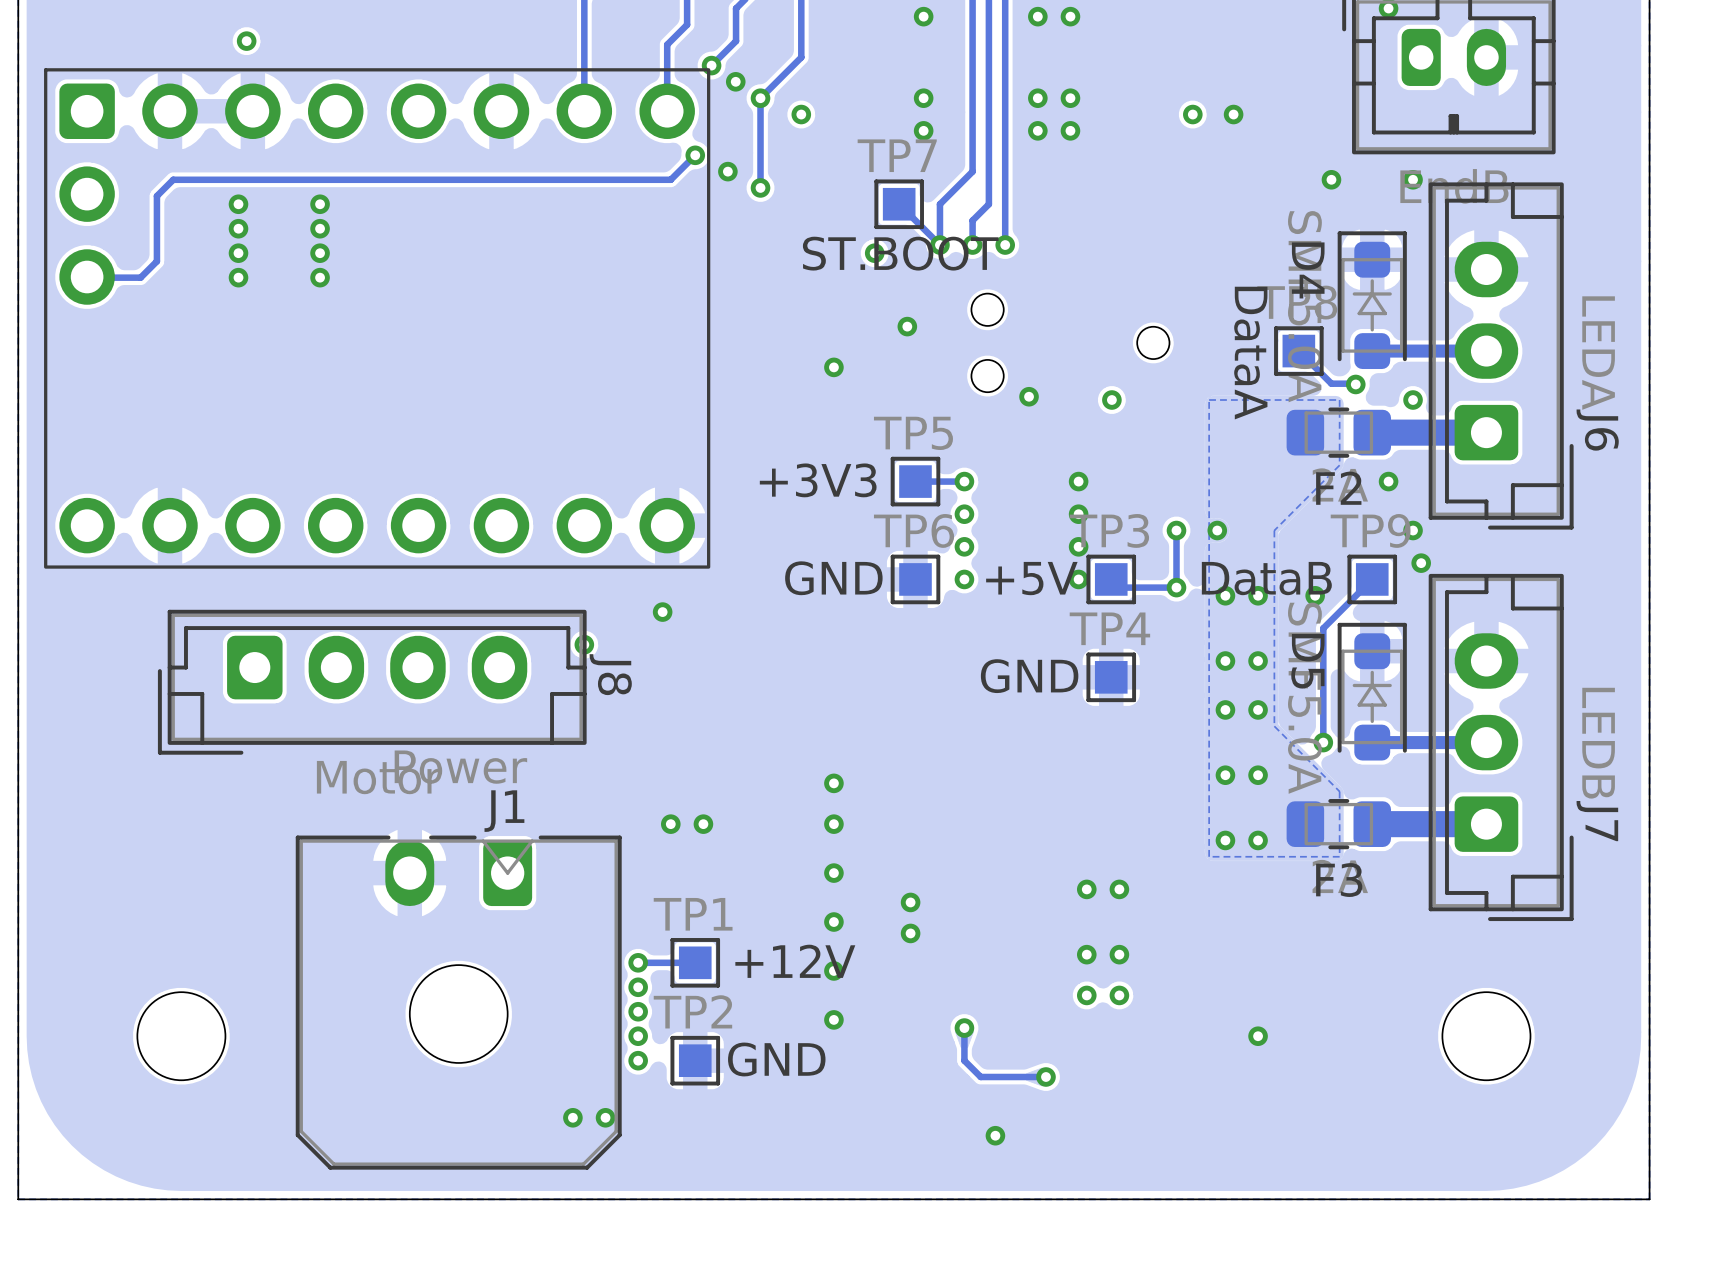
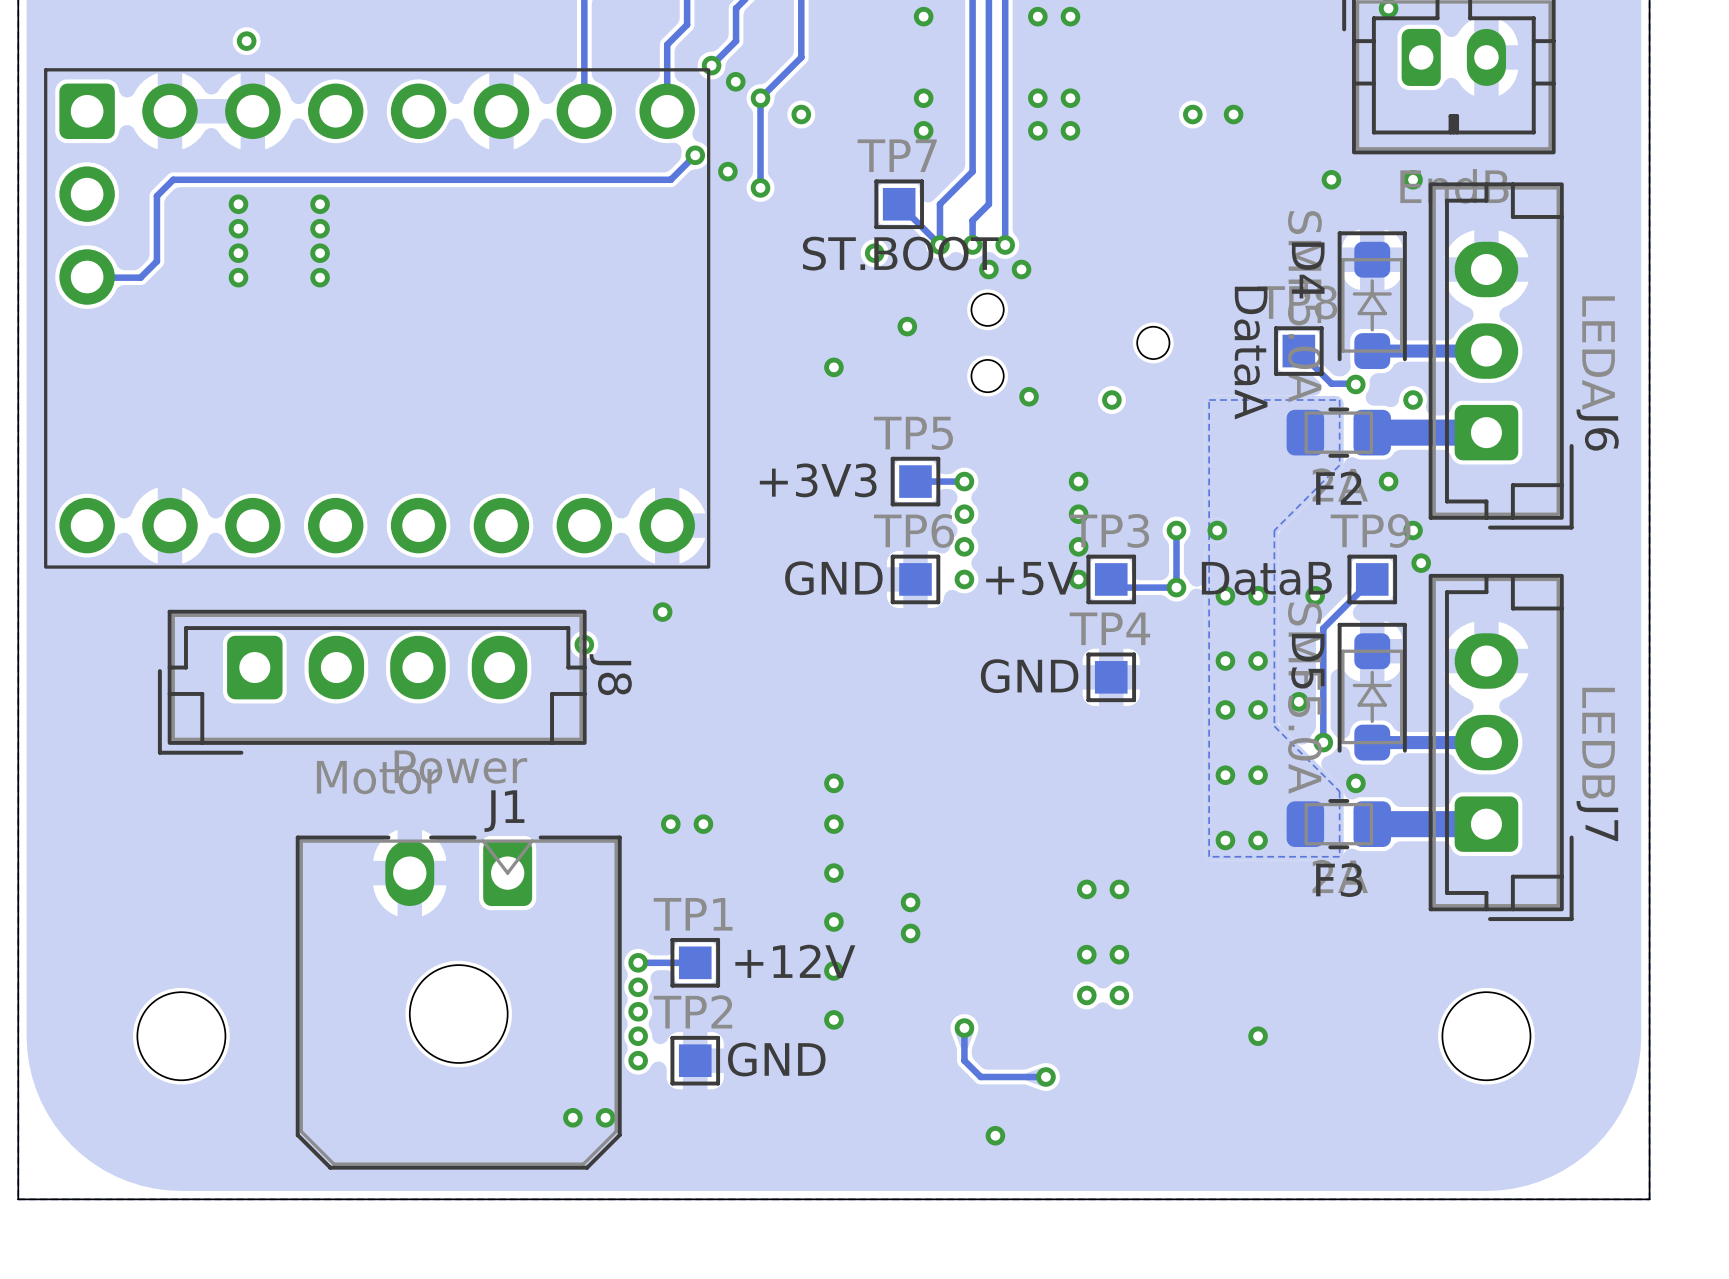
via: none -> (988, 269)
via: none -> (1021, 269)
via: none -> (1298, 701)
via: none -> (1355, 783)

